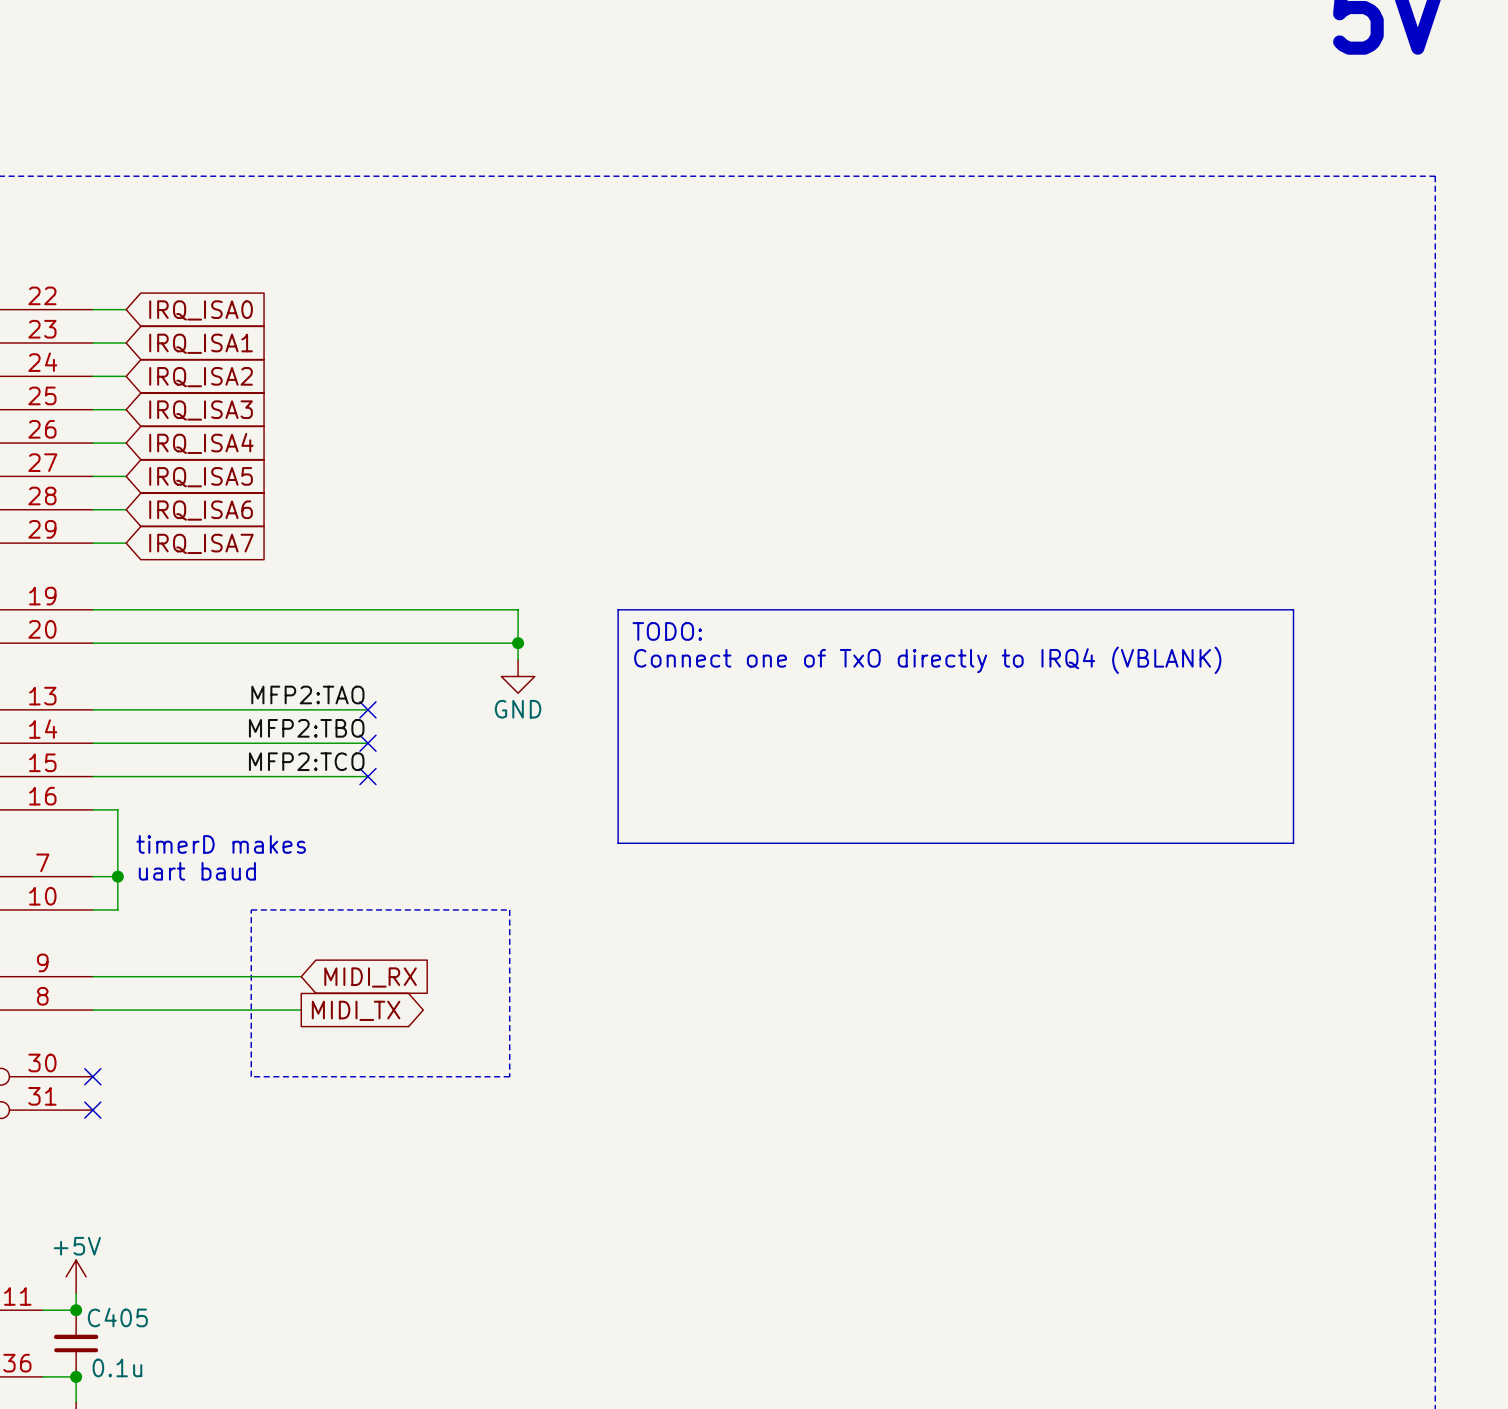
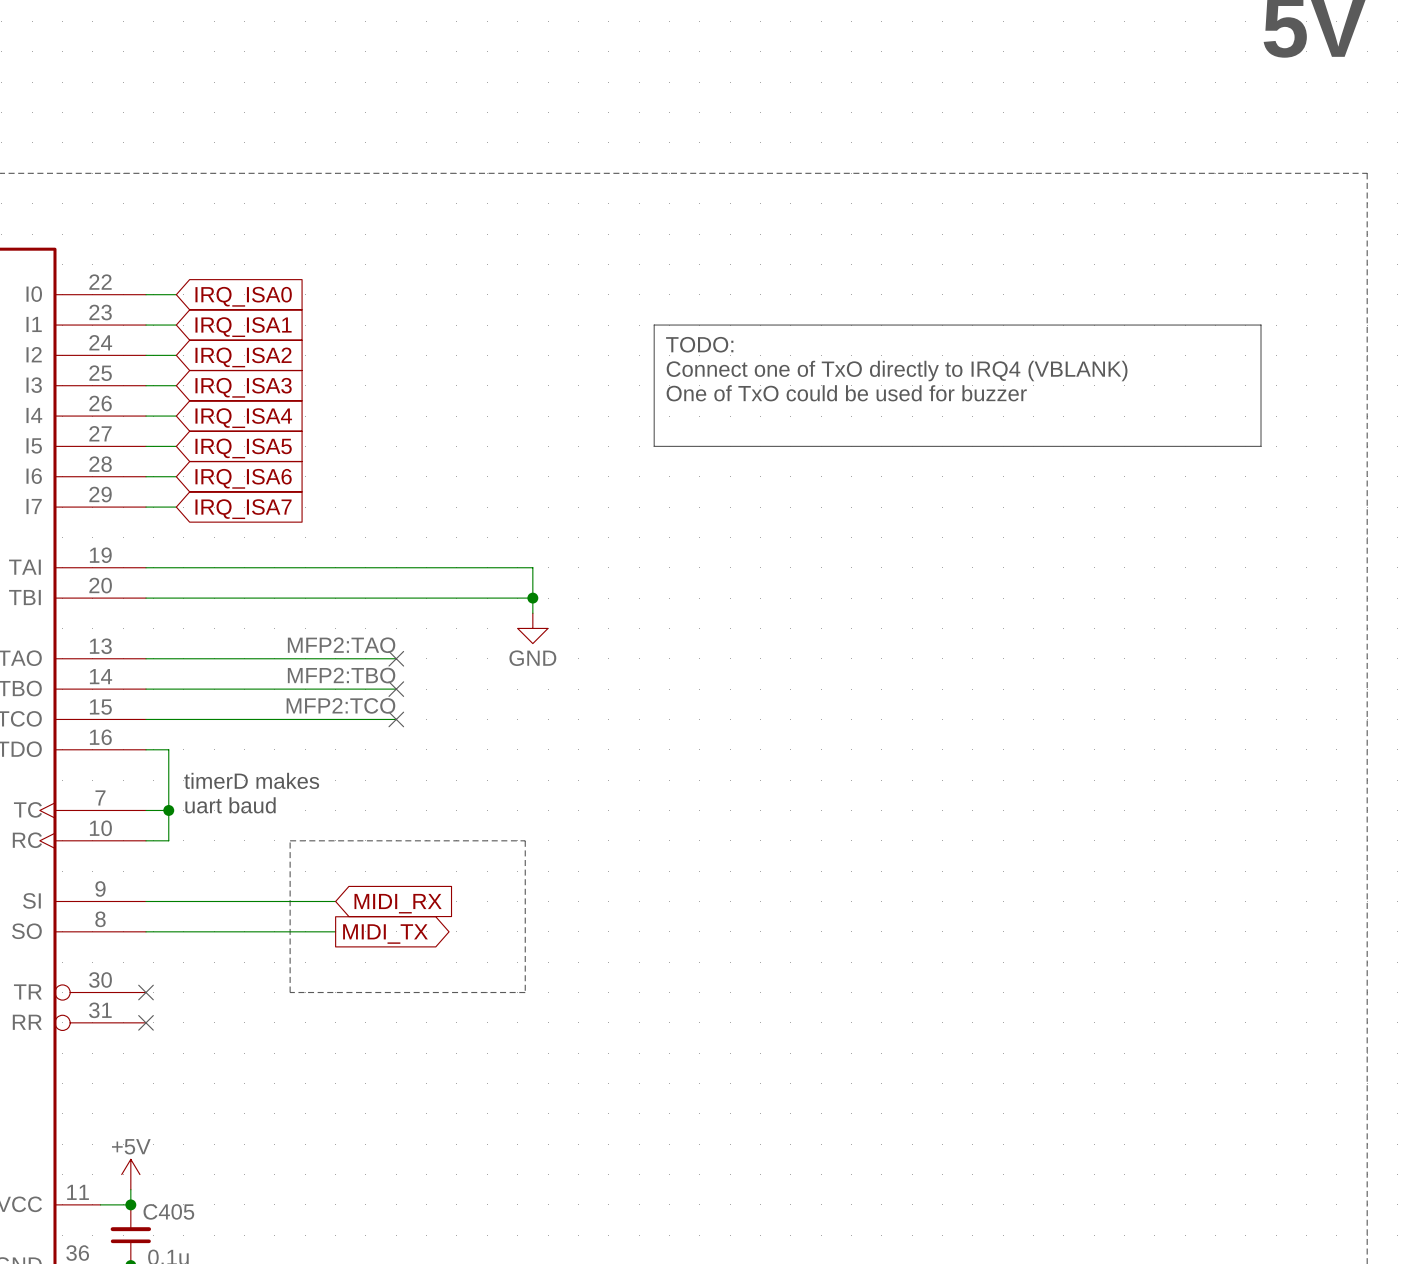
line: none -> (654, 325) (1261, 325) (1261, 446) (654, 446) (654, 325)
text: none -> One of TxO could be used for buzzer (846, 393)
line: (618, 609) (1293, 609) (1293, 843) (618, 843) (618, 609) -> none
text position: TODO: (667, 631) -> TODO: (699, 344)
text position: Connect one of TxO directly to IRQ4 (VBLANK) (927, 660) -> Connect one of TxO directly to IRQ4 (VBLANK) (897, 371)

